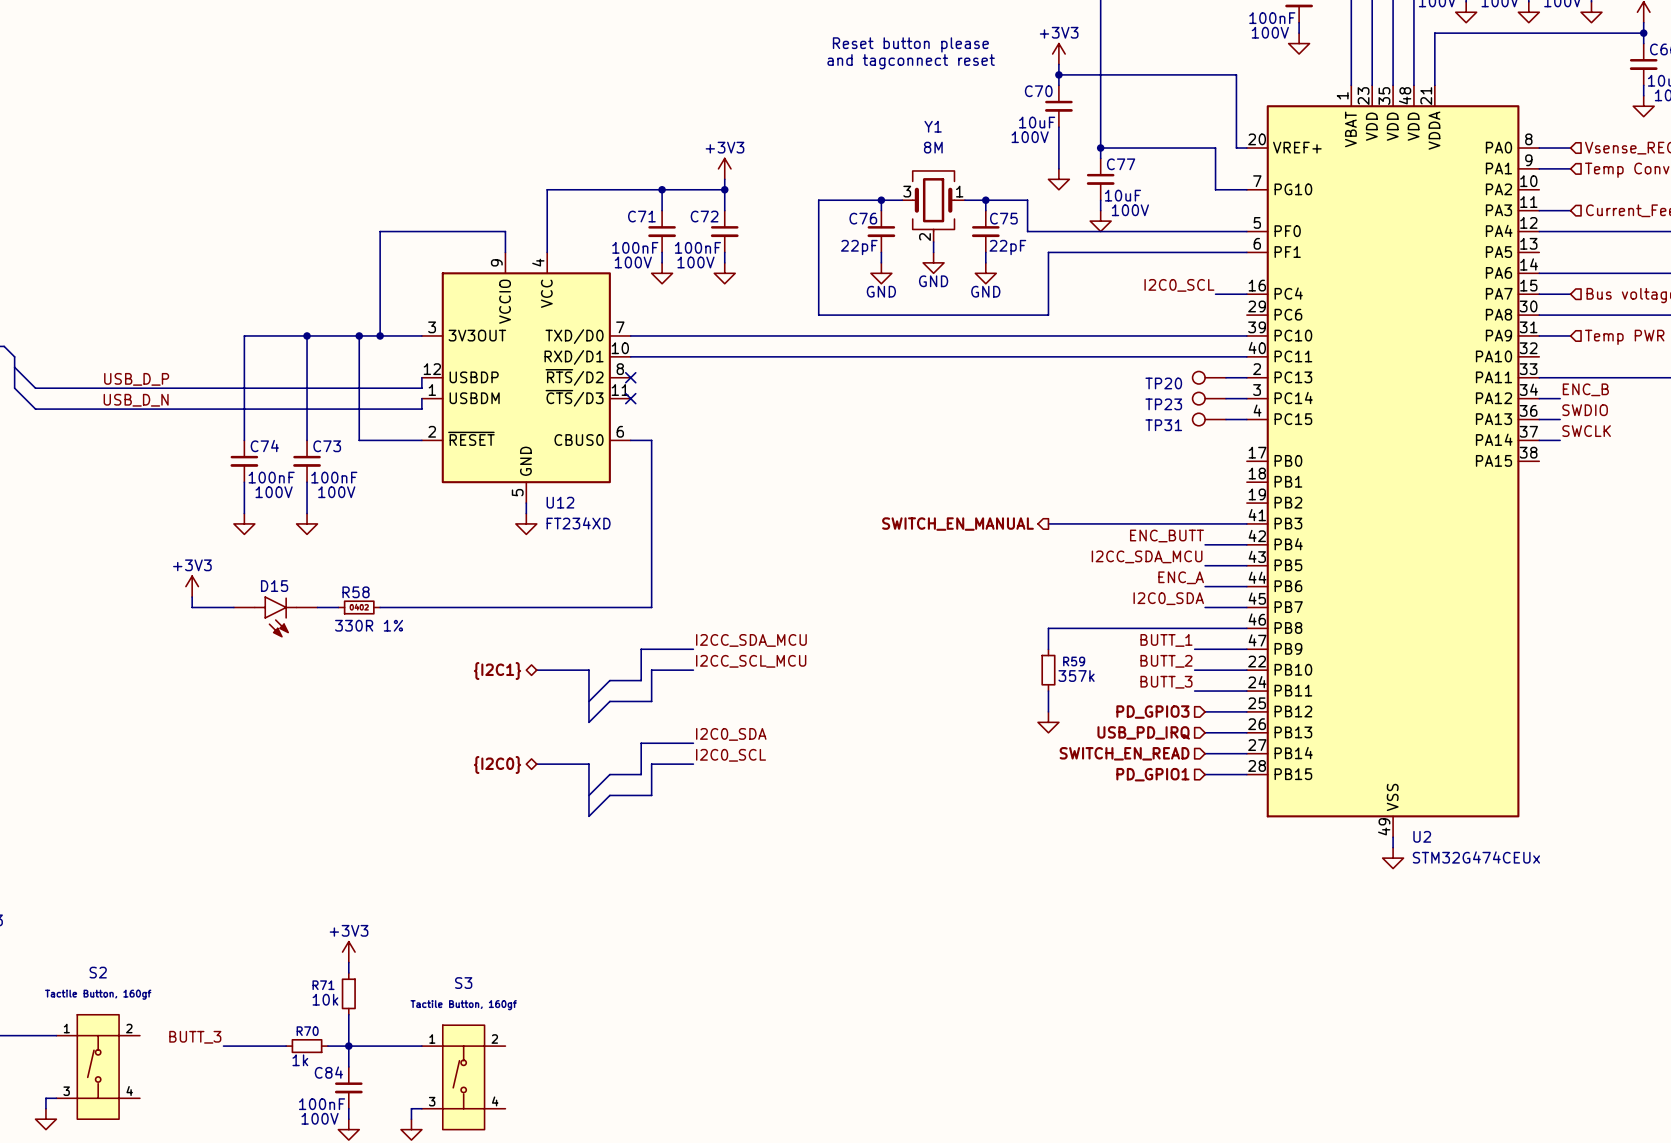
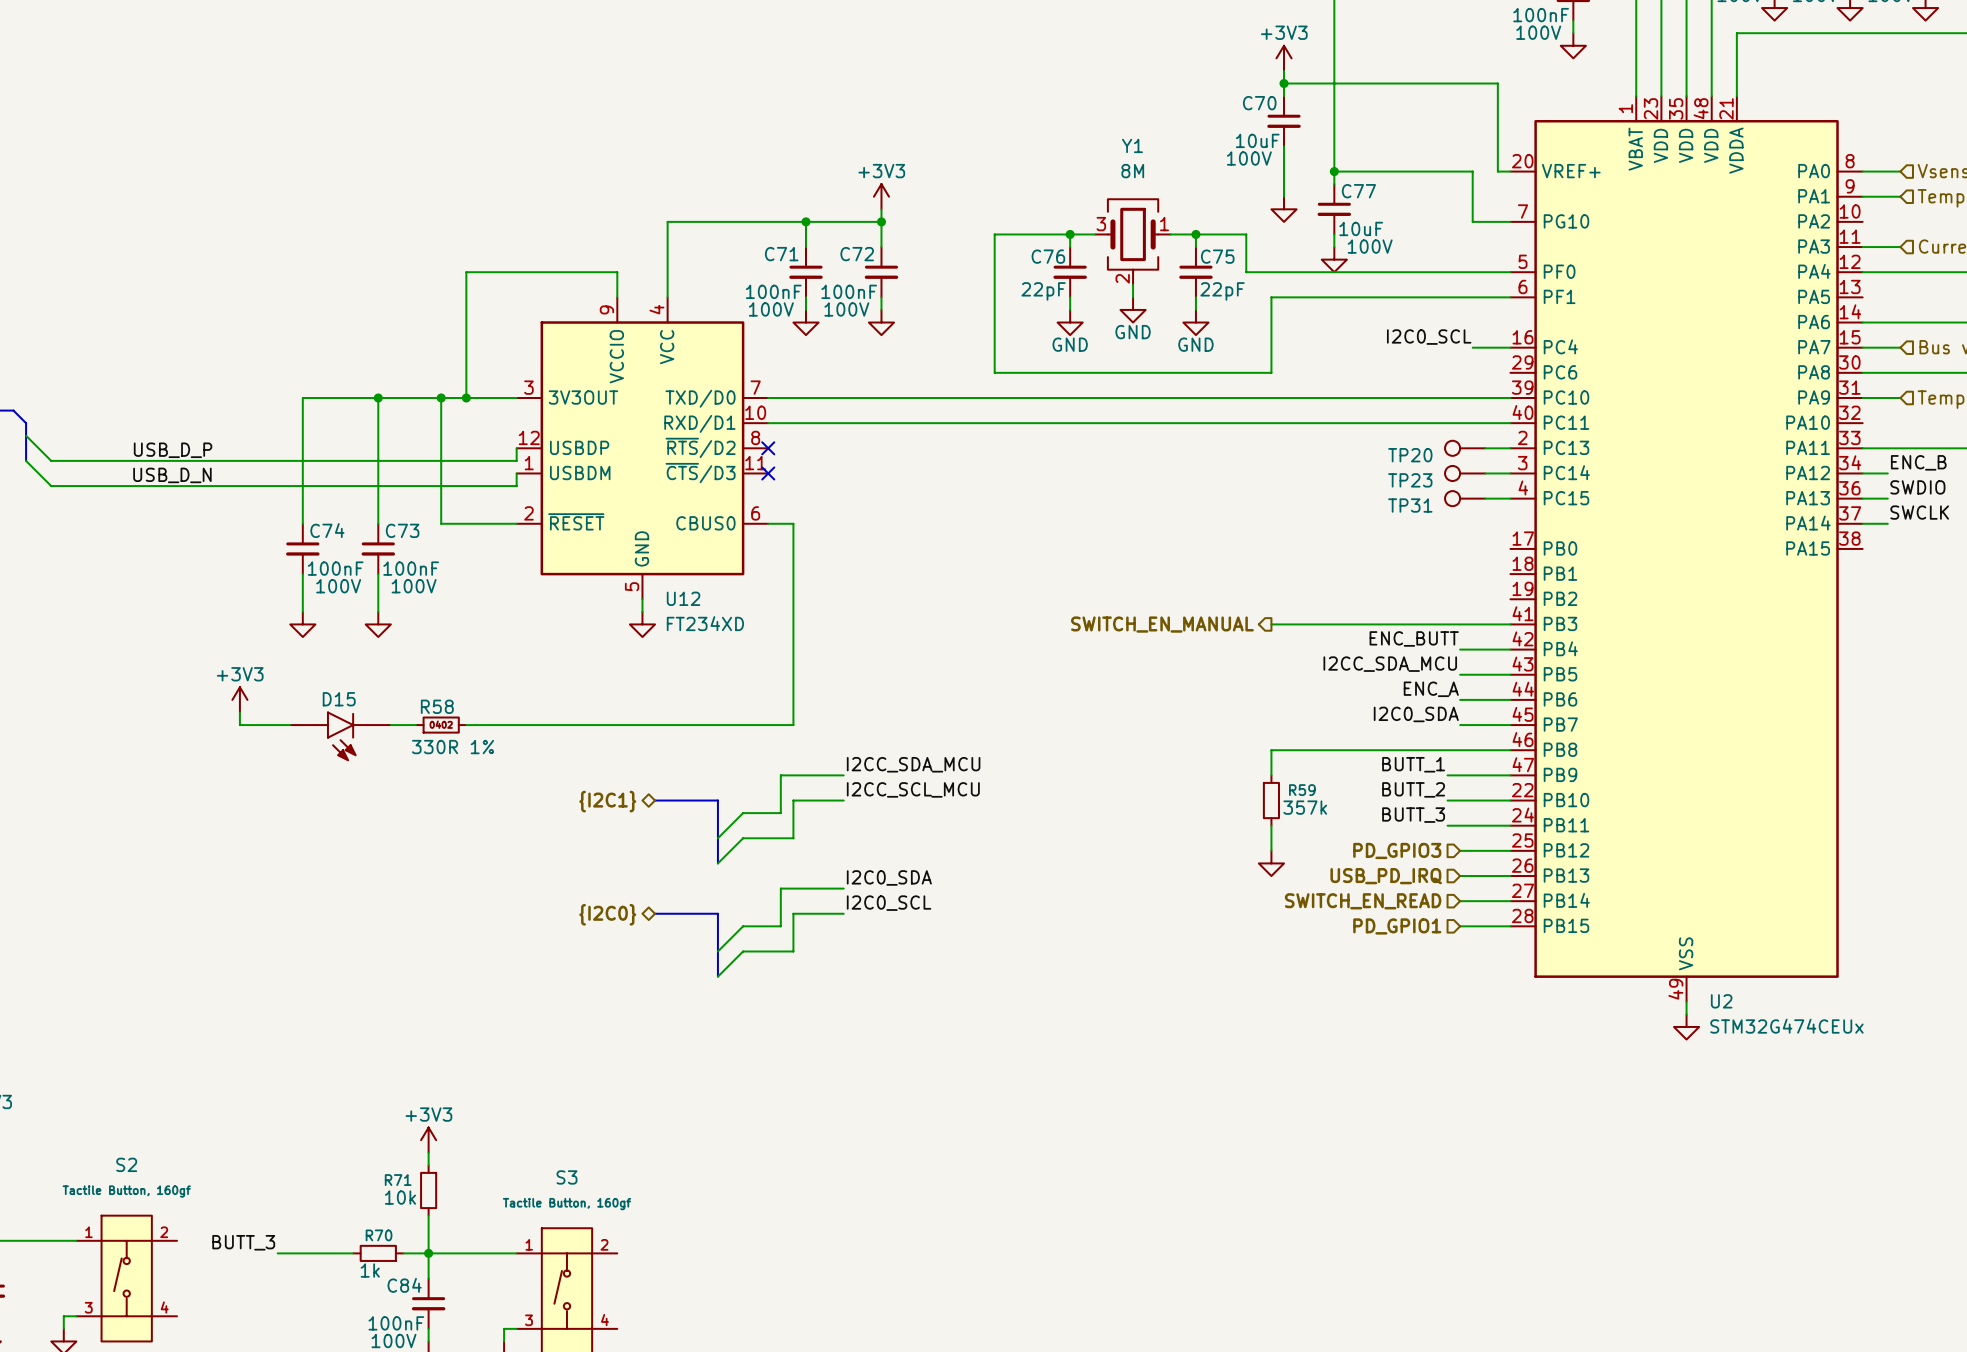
text: Reset button please (910, 44) -> none
text: and tagconnect reset (911, 61) -> none

